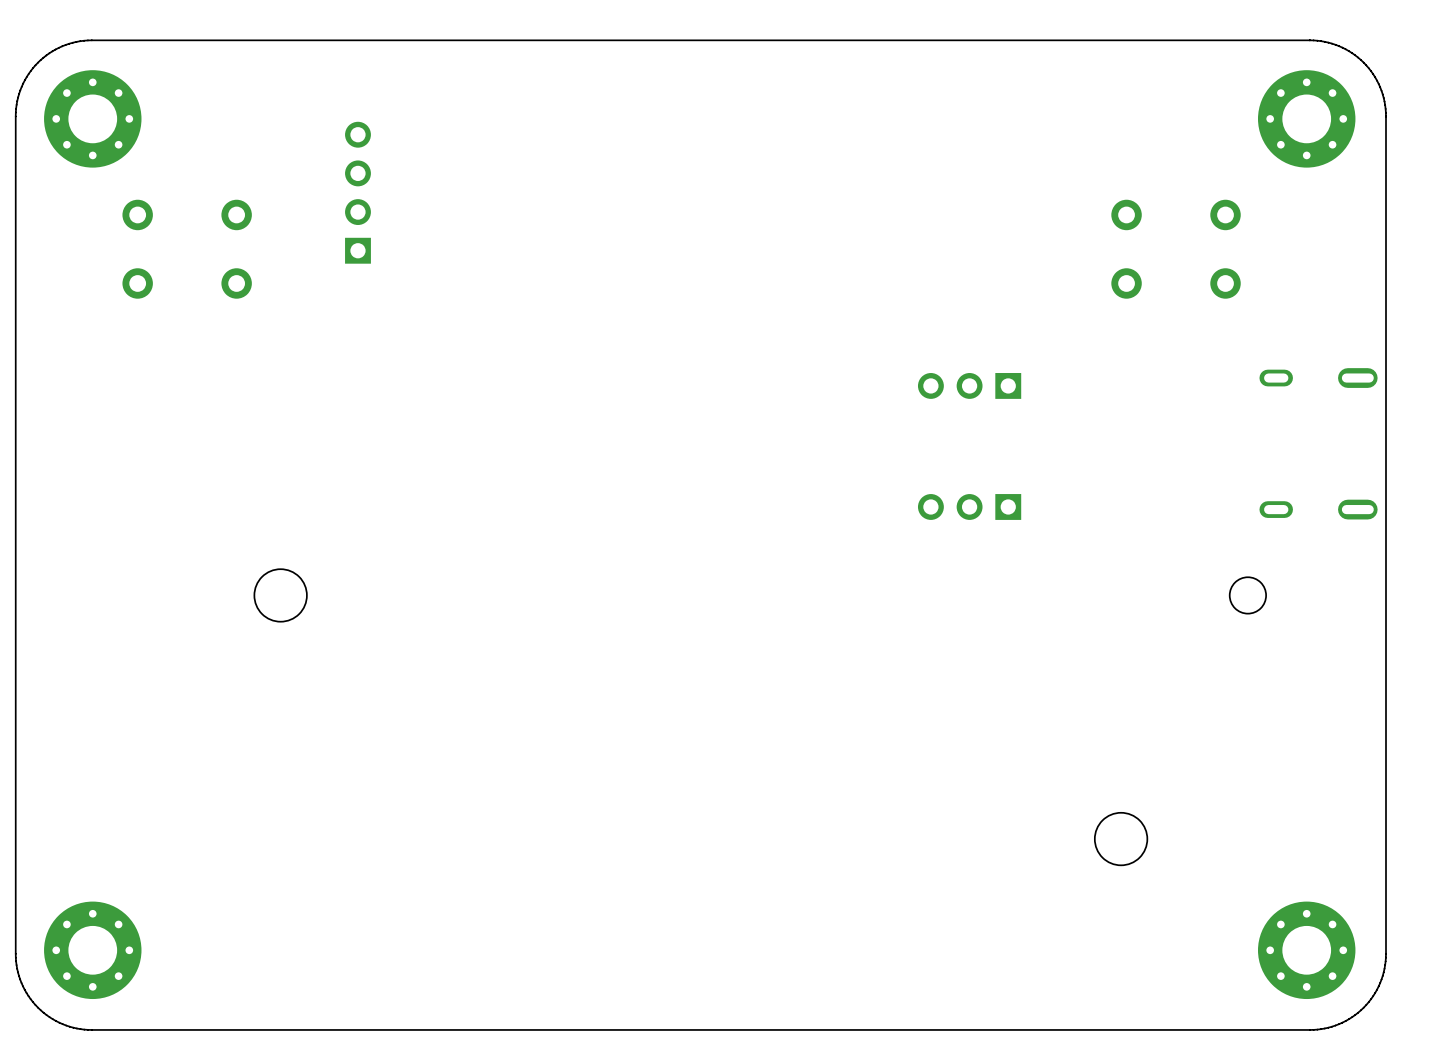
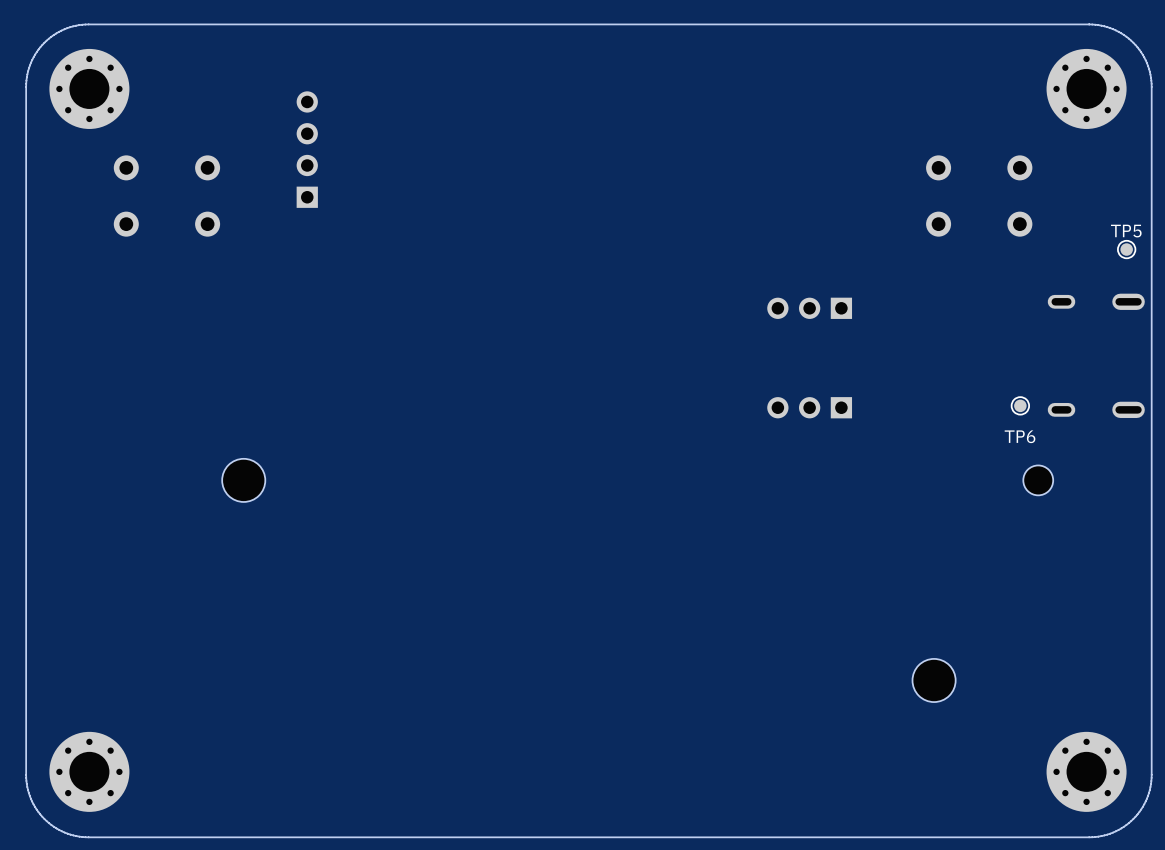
TP5: none -> (1126, 249)
TP6: none -> (1020, 405)

